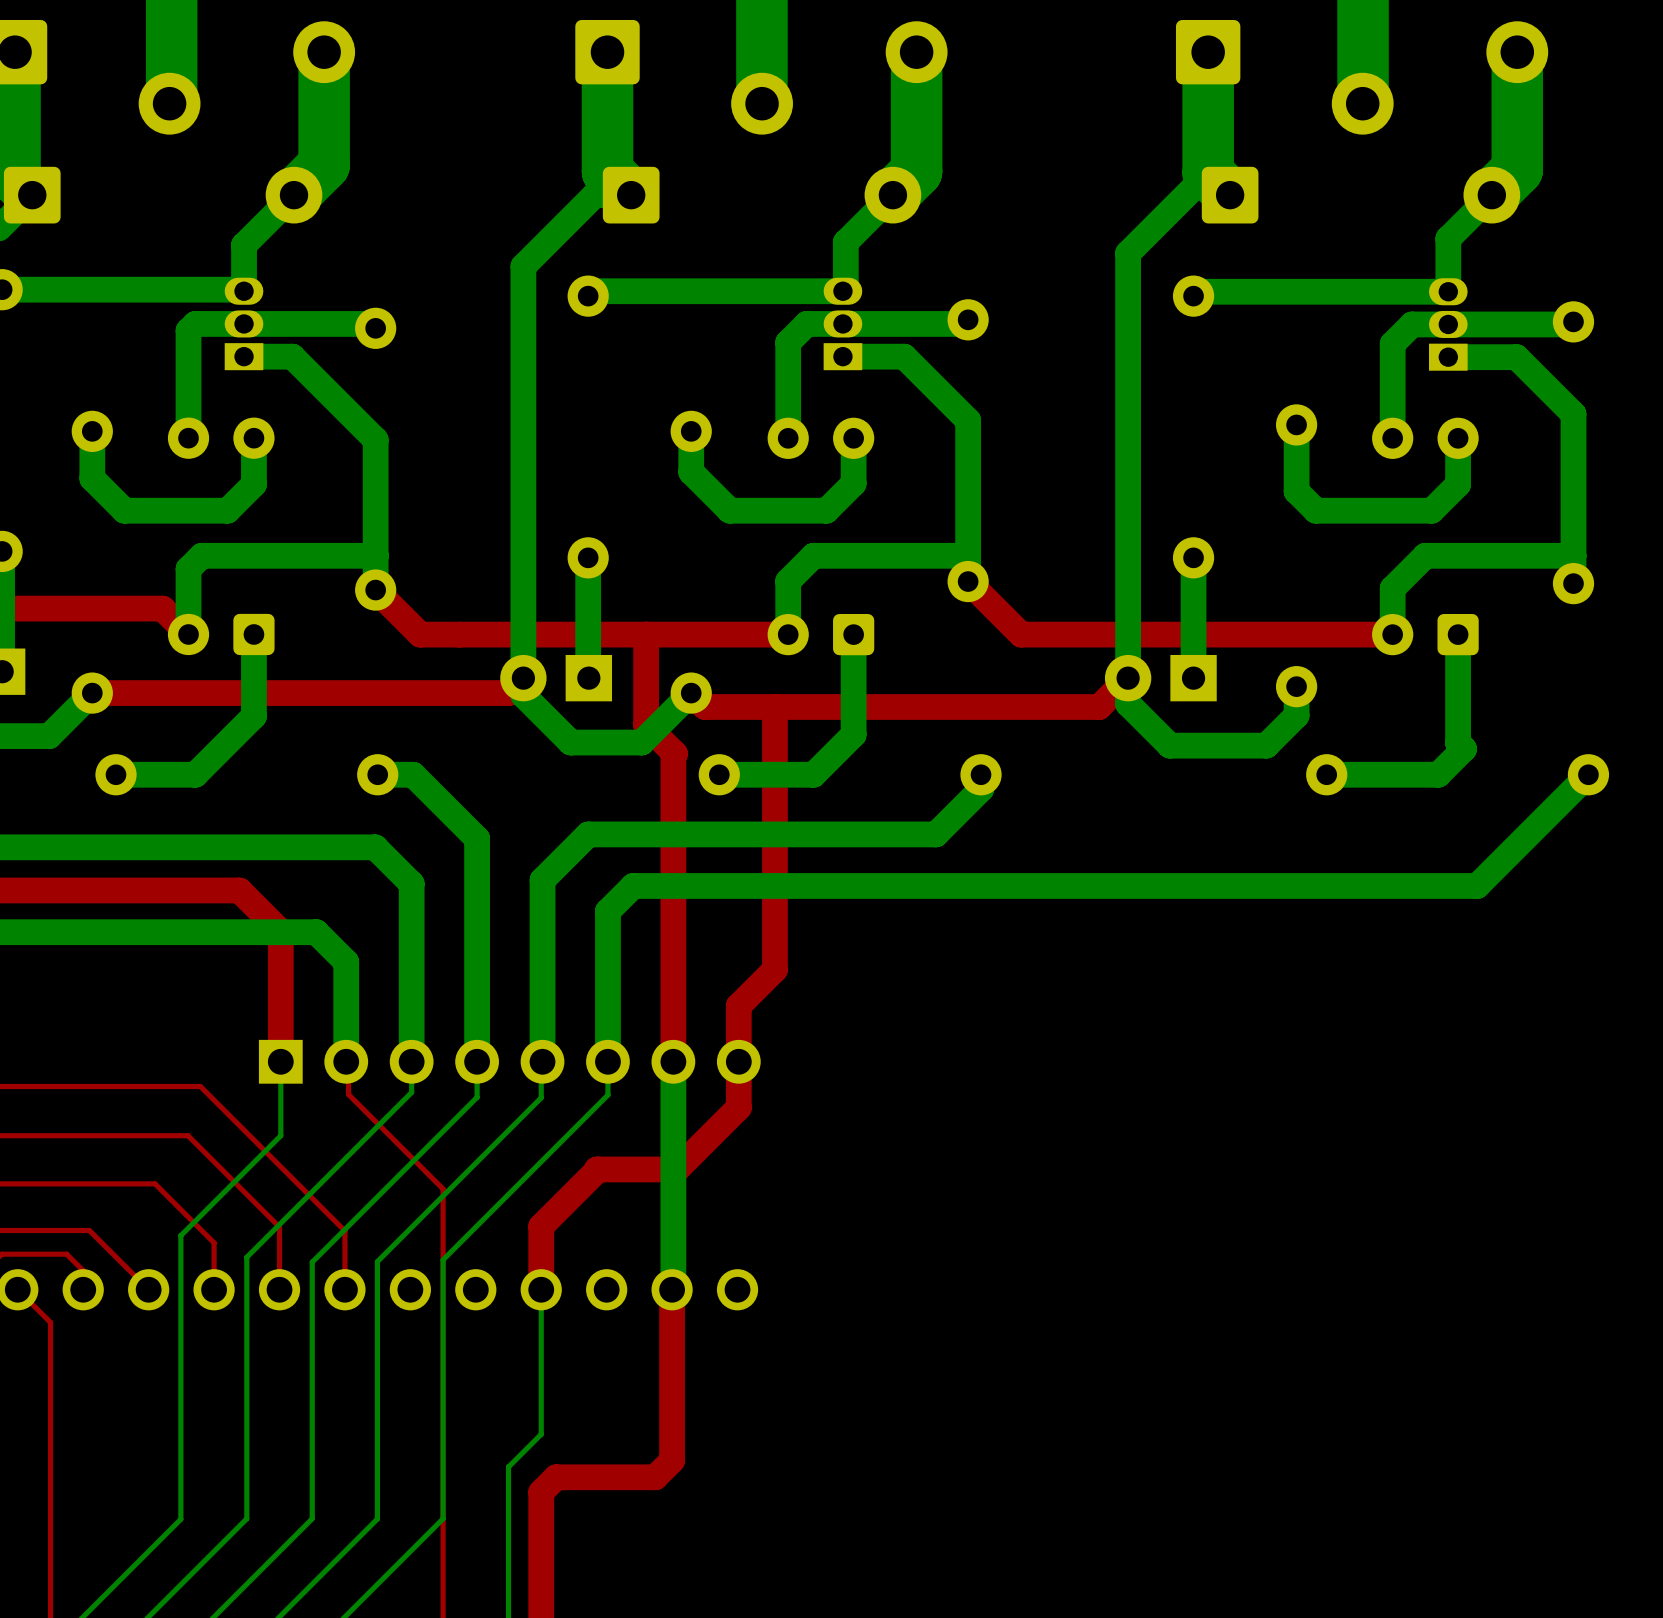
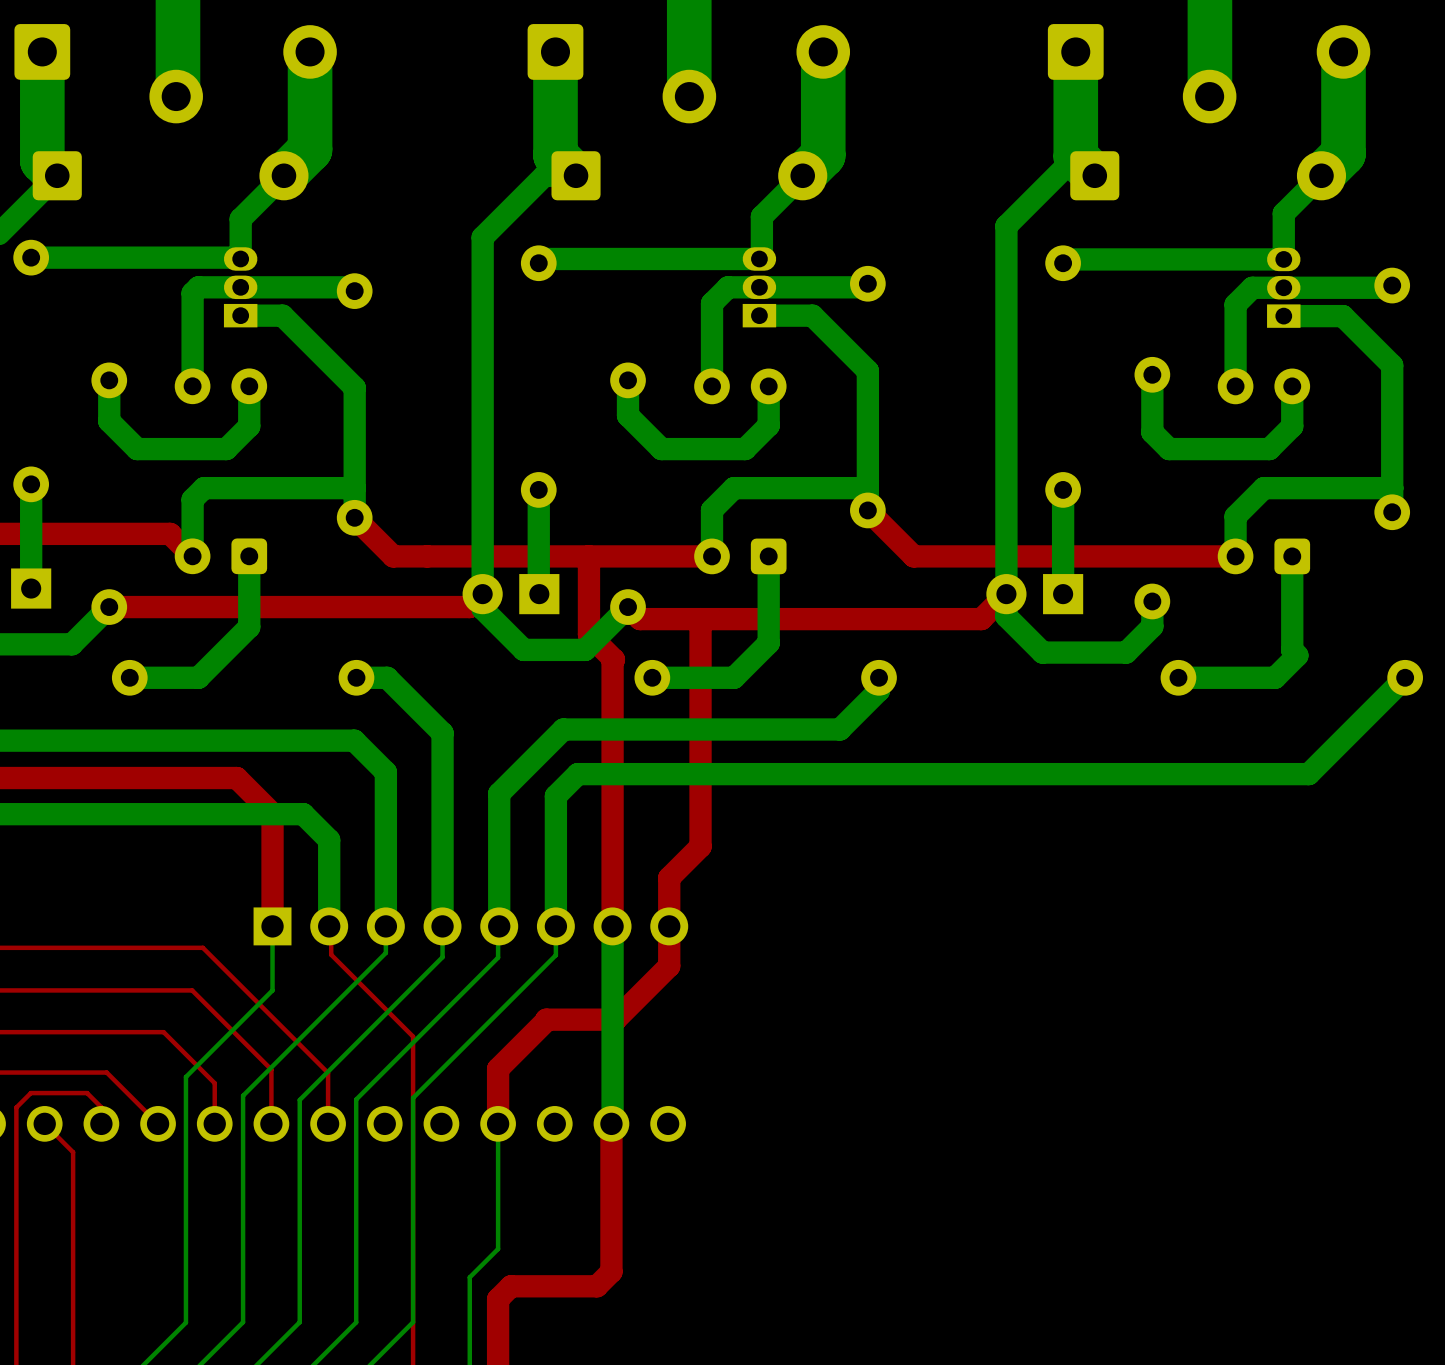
bottom track: (616, 834) (588, 834) (542, 880) (542, 908) -> (563, 729) (499, 793)

